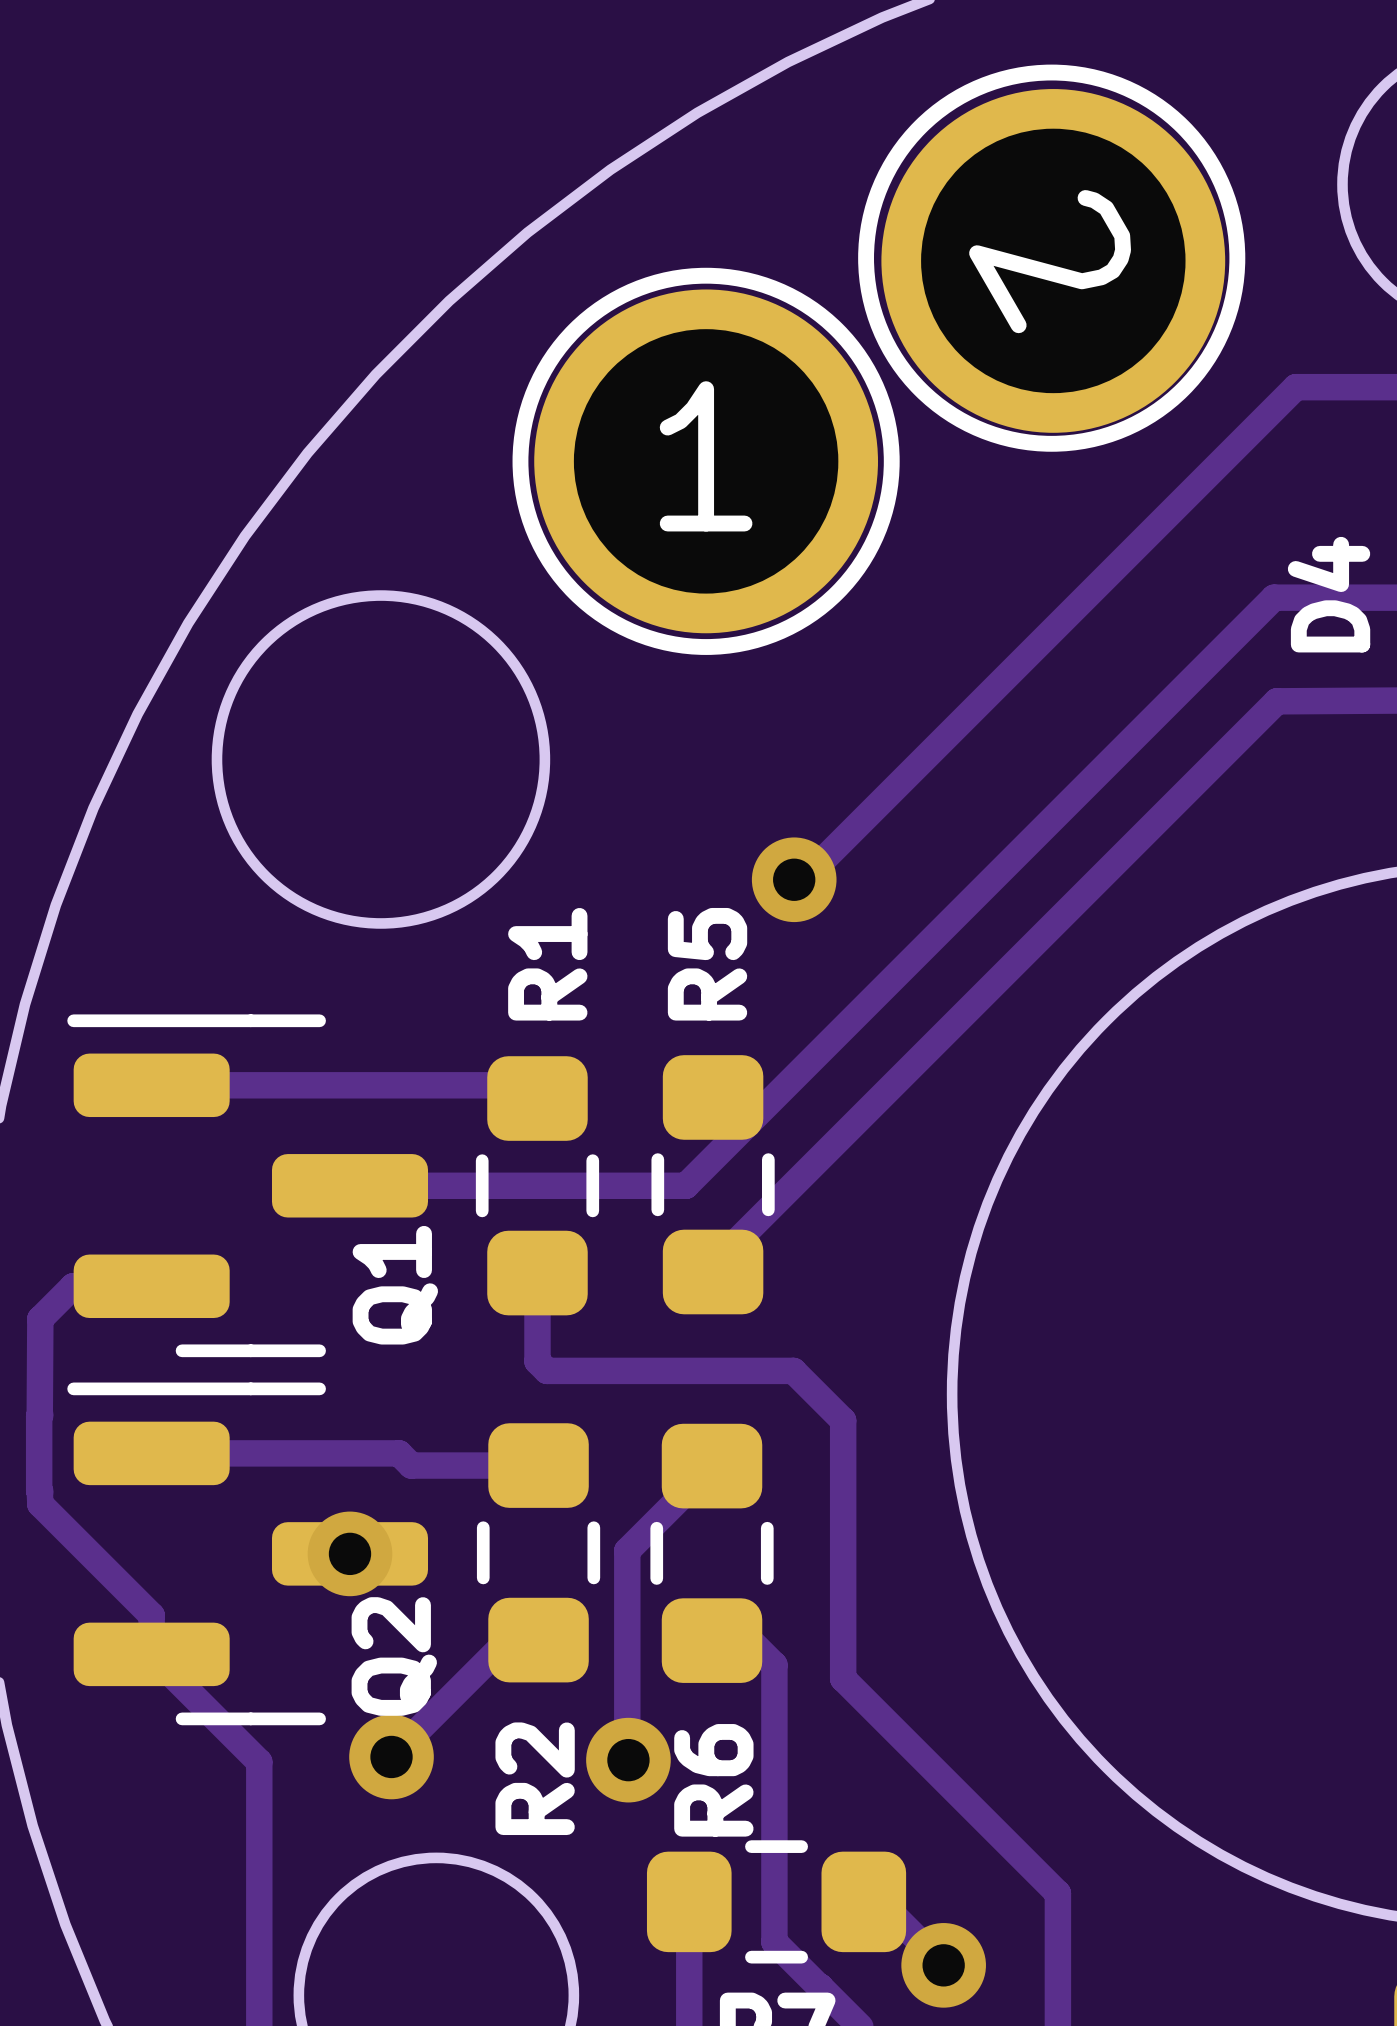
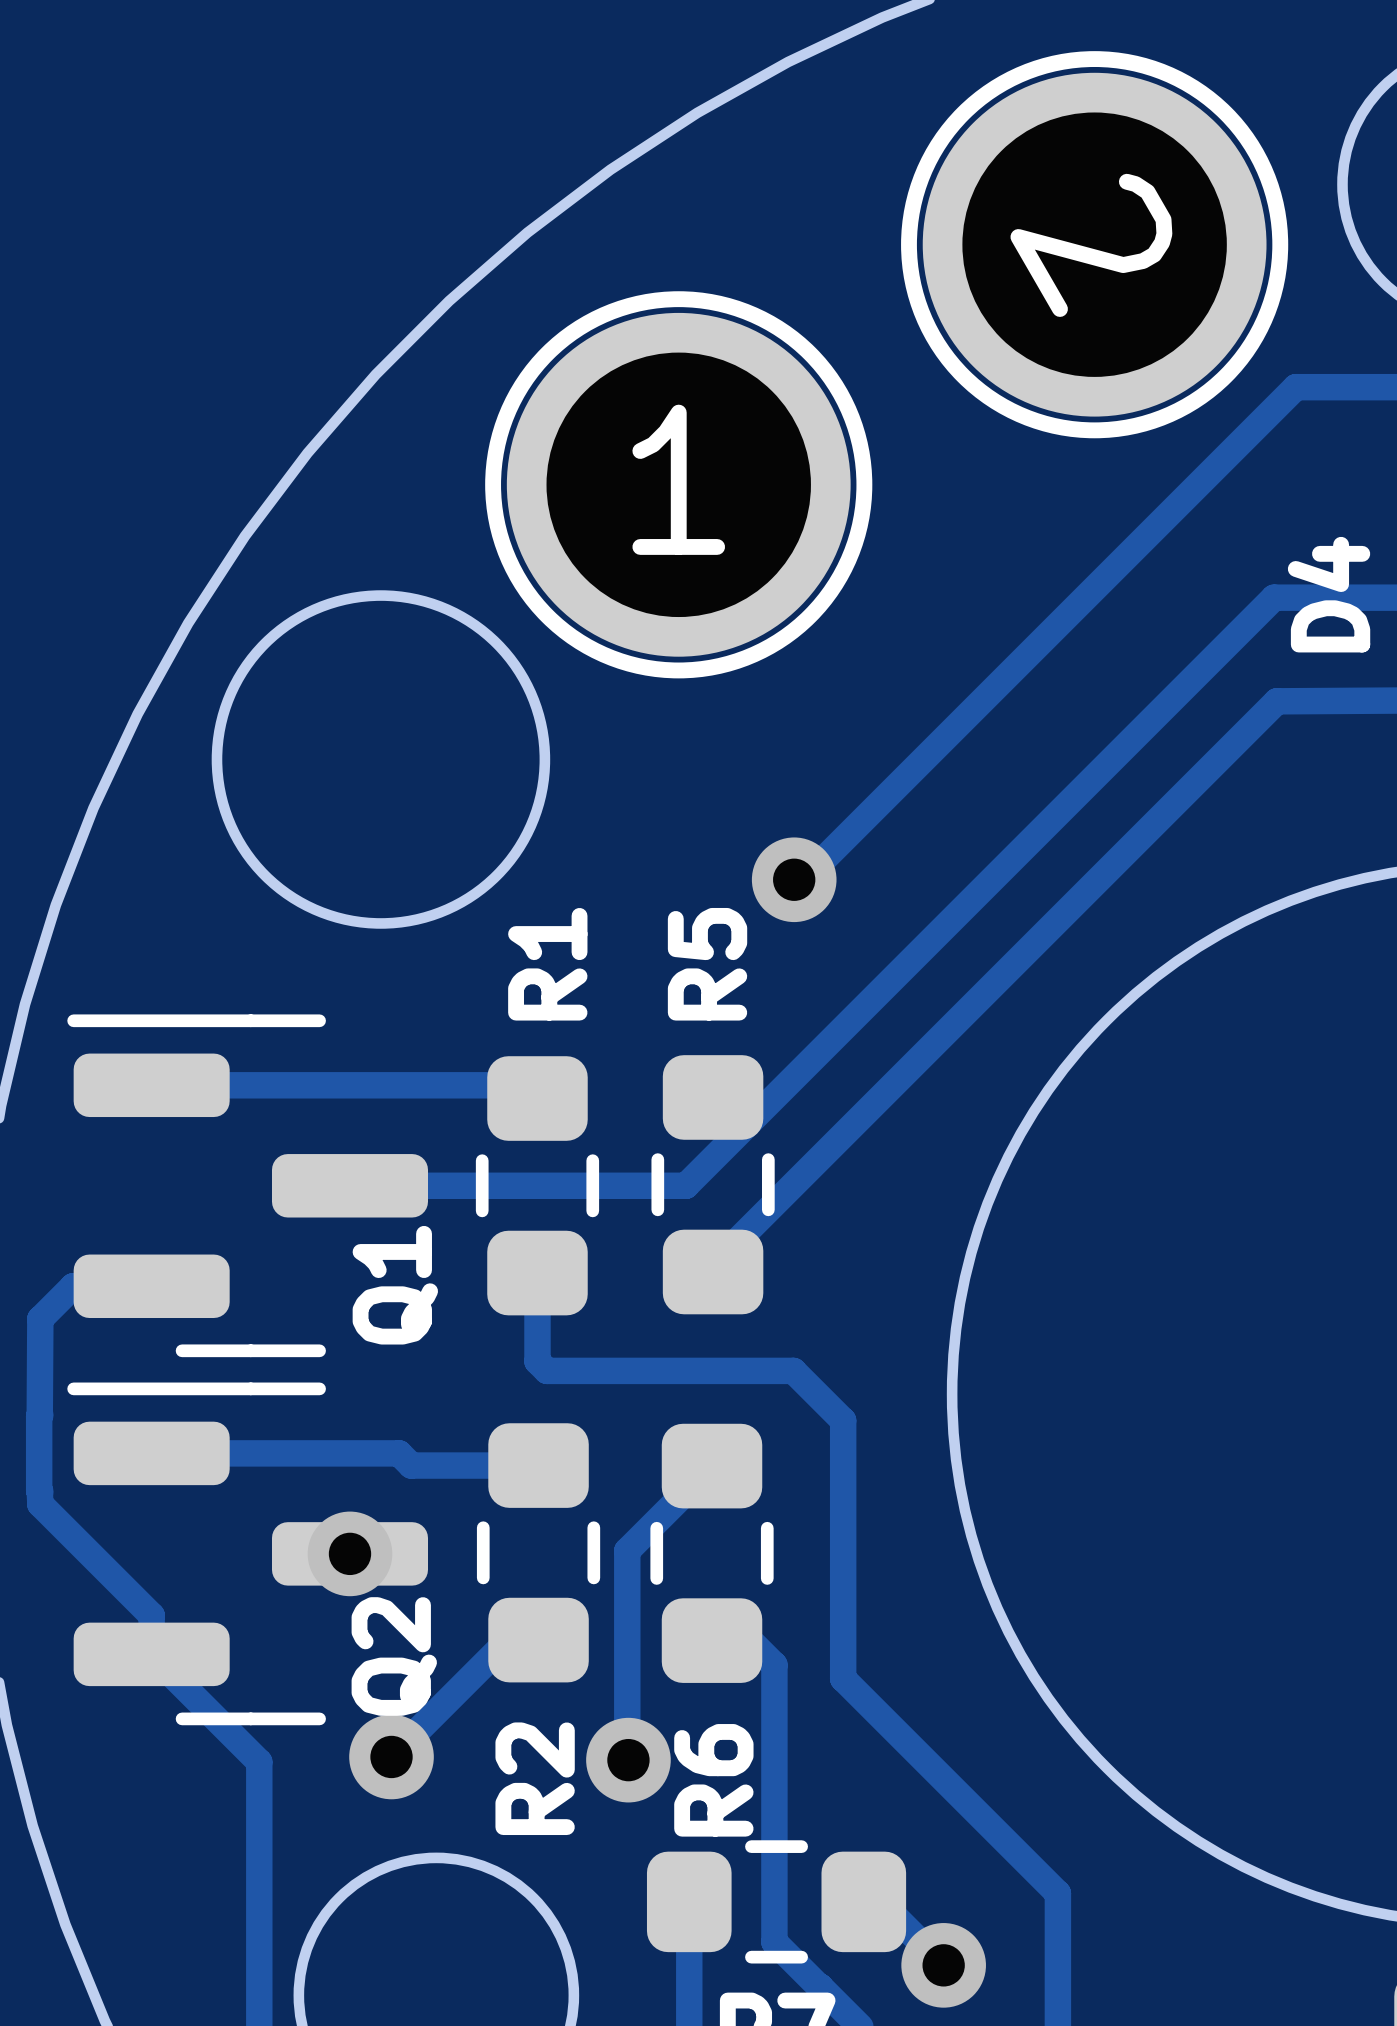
drawing position: (1051, 258) -> (1094, 244)
2 position: (1053, 260) -> (1094, 244)
1 position: (706, 461) -> (678, 484)
drawing position: (706, 461) -> (678, 484)

